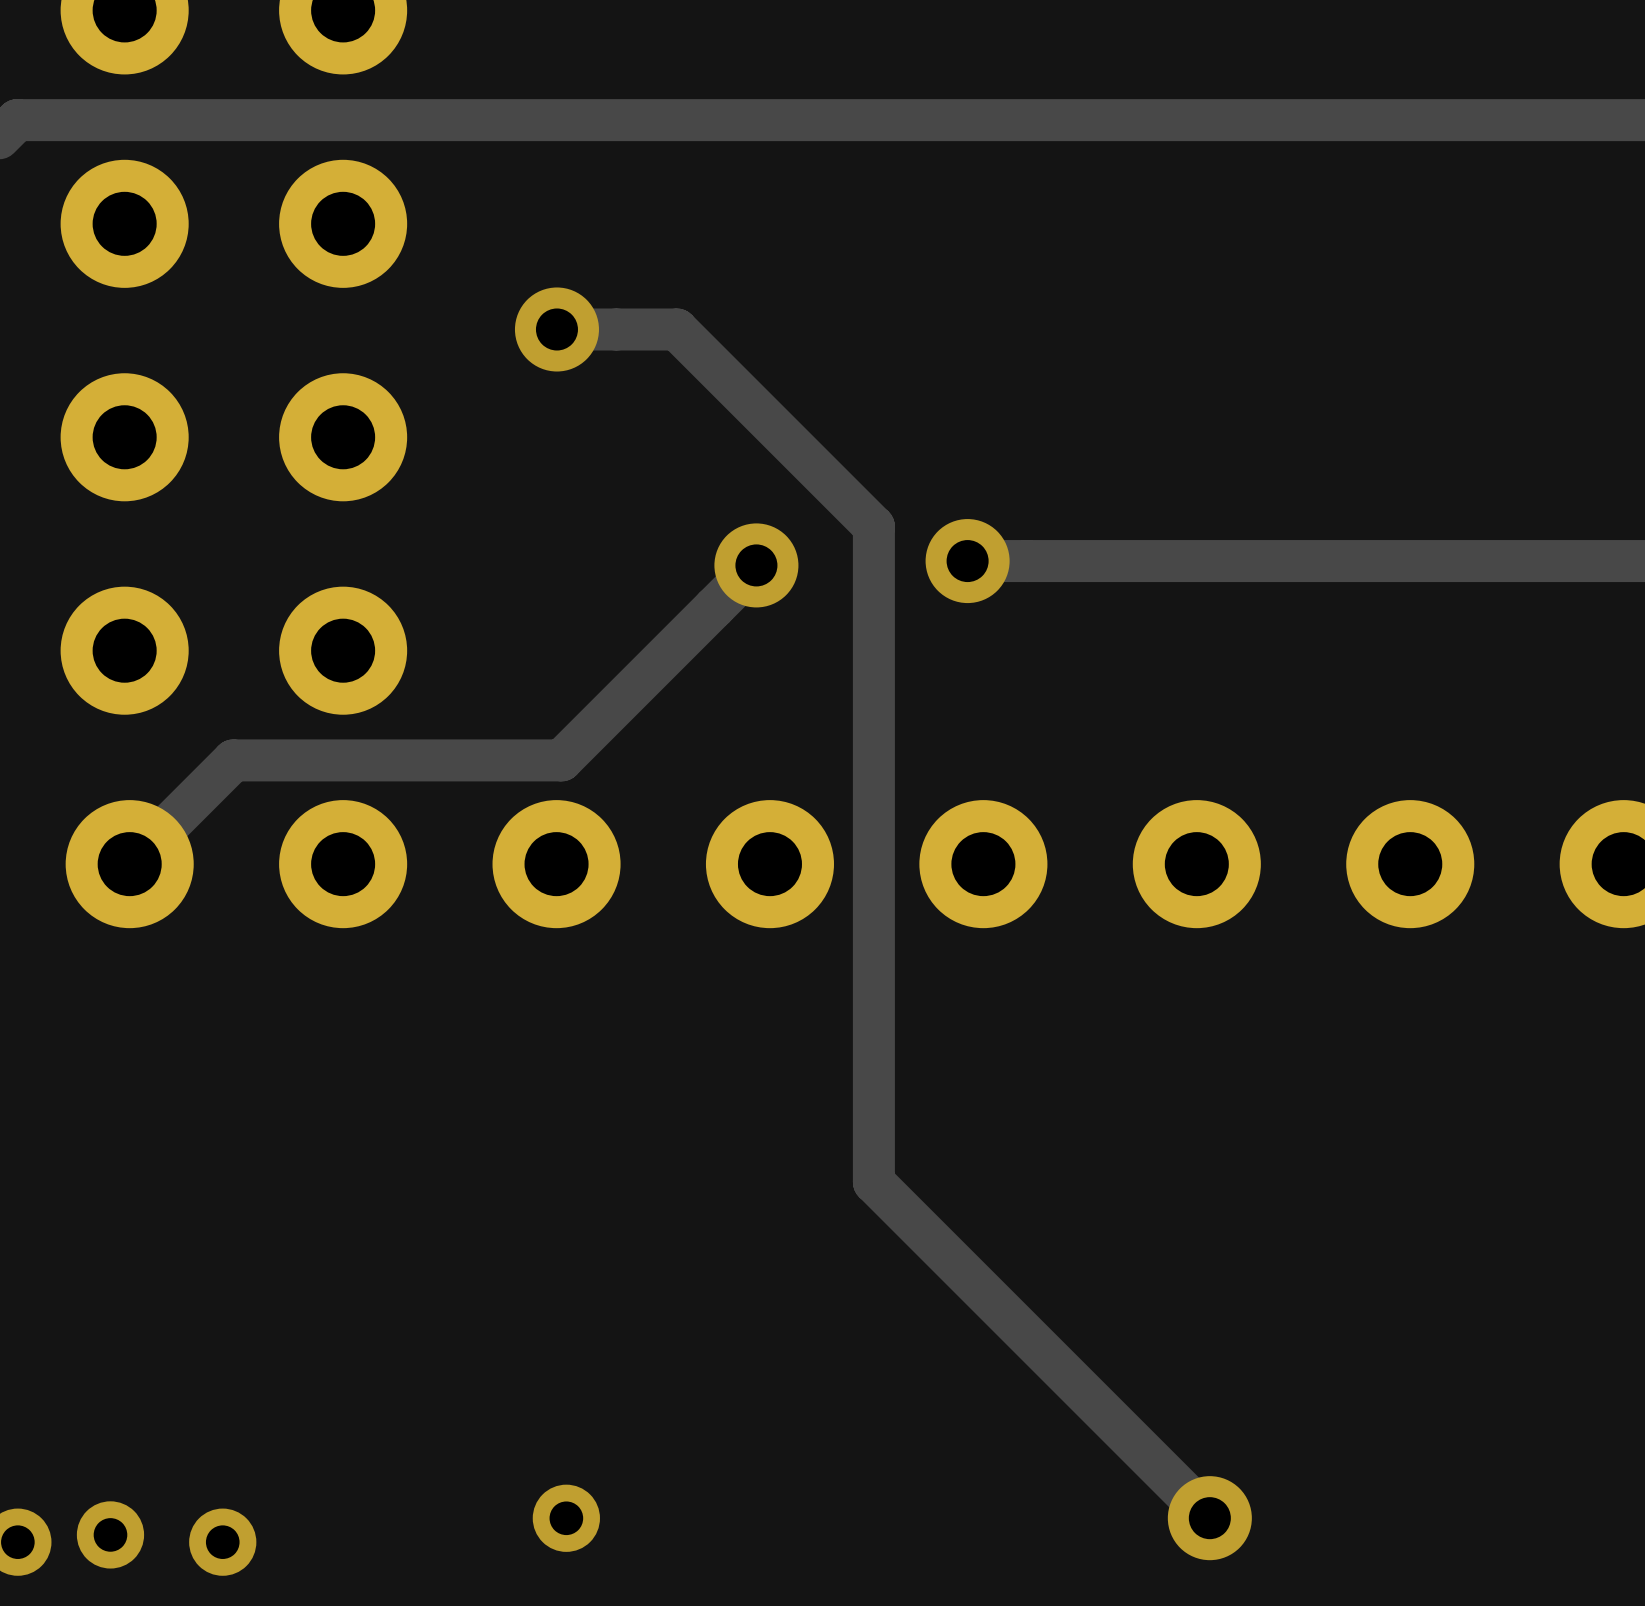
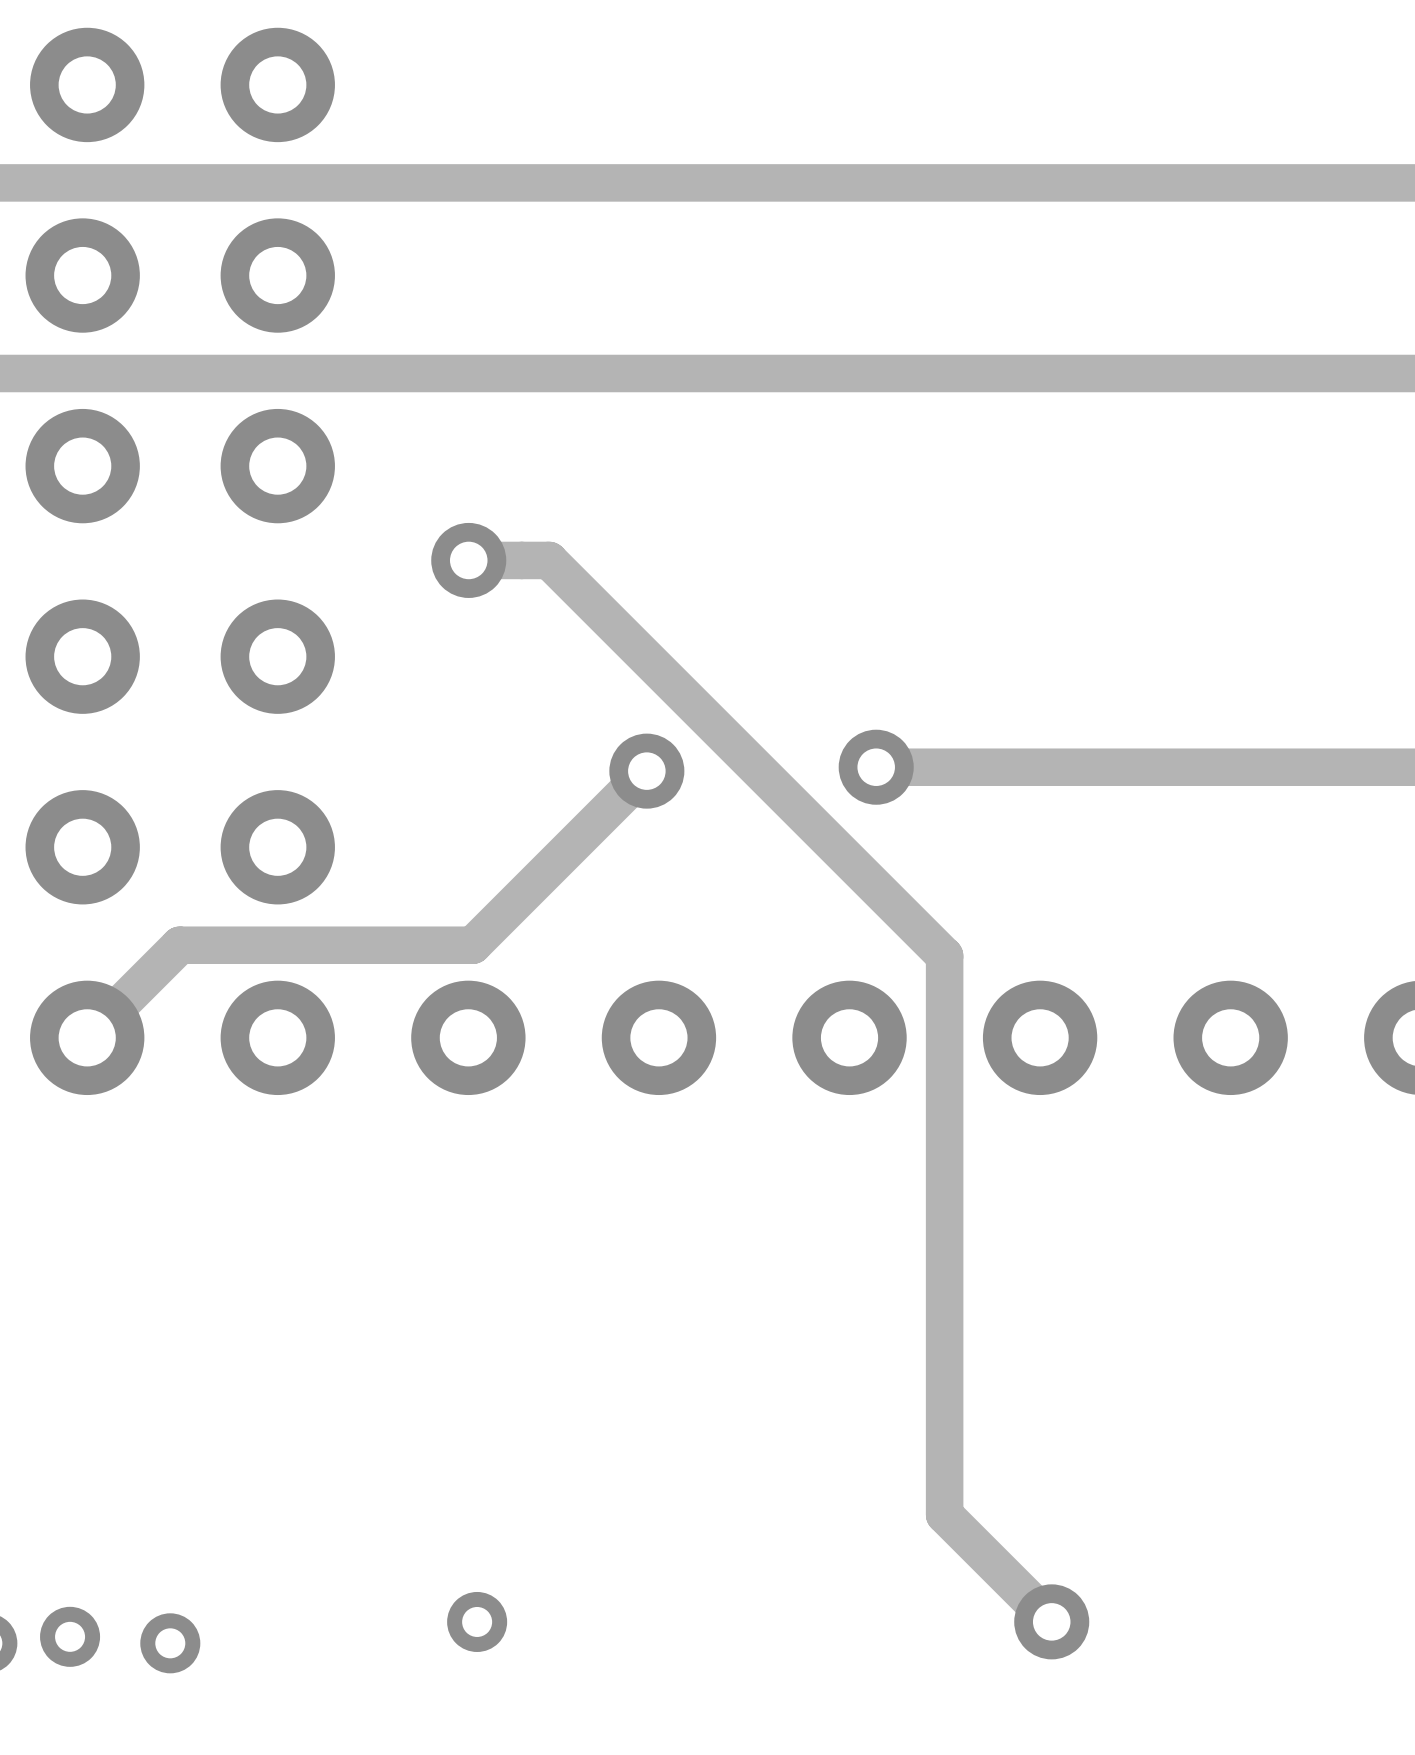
track: (646, 329) (676, 329) (873, 526) (873, 1182) (1089, 1398) -> (549, 560) (944, 955) (944, 1514)
via position: (967, 561) -> (876, 767)

